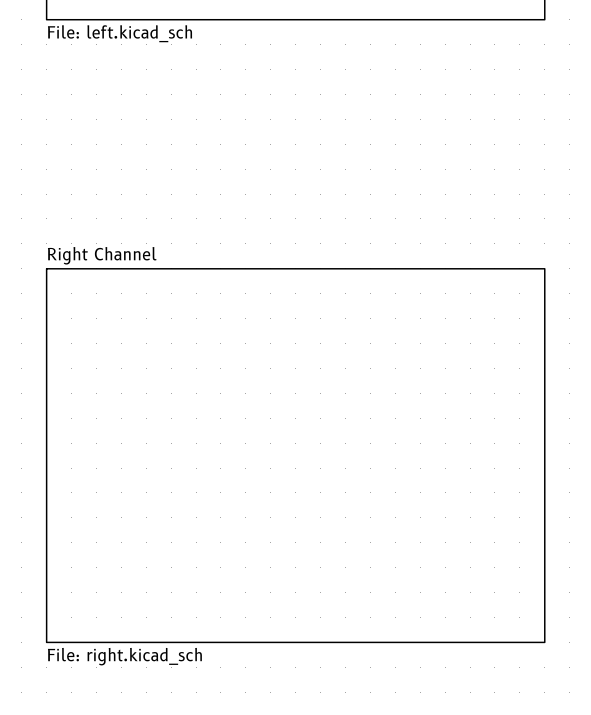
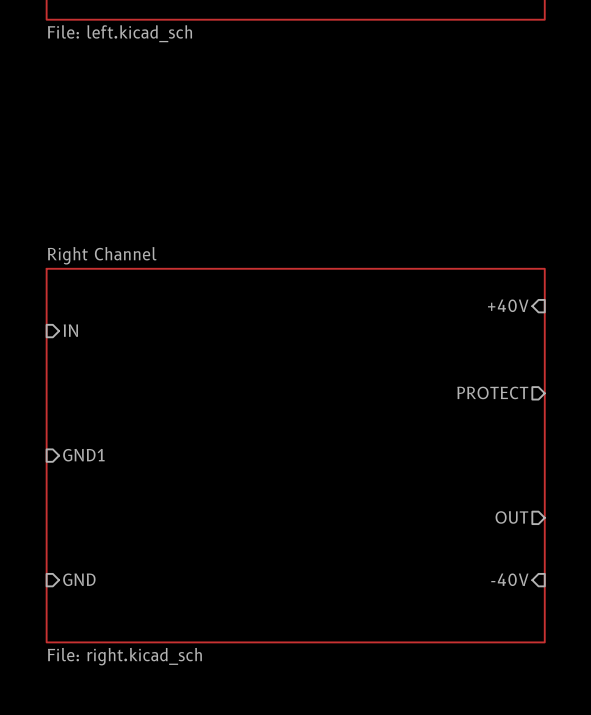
sheet pin: none -> +40V (508, 305)
sheet pin: none -> IN (70, 330)
sheet pin: none -> PROTECT (492, 392)
sheet pin: none -> GND1 (83, 455)
sheet pin: none -> OUT (511, 517)
sheet pin: none -> GND (79, 579)
sheet pin: none -> -40V (509, 579)

